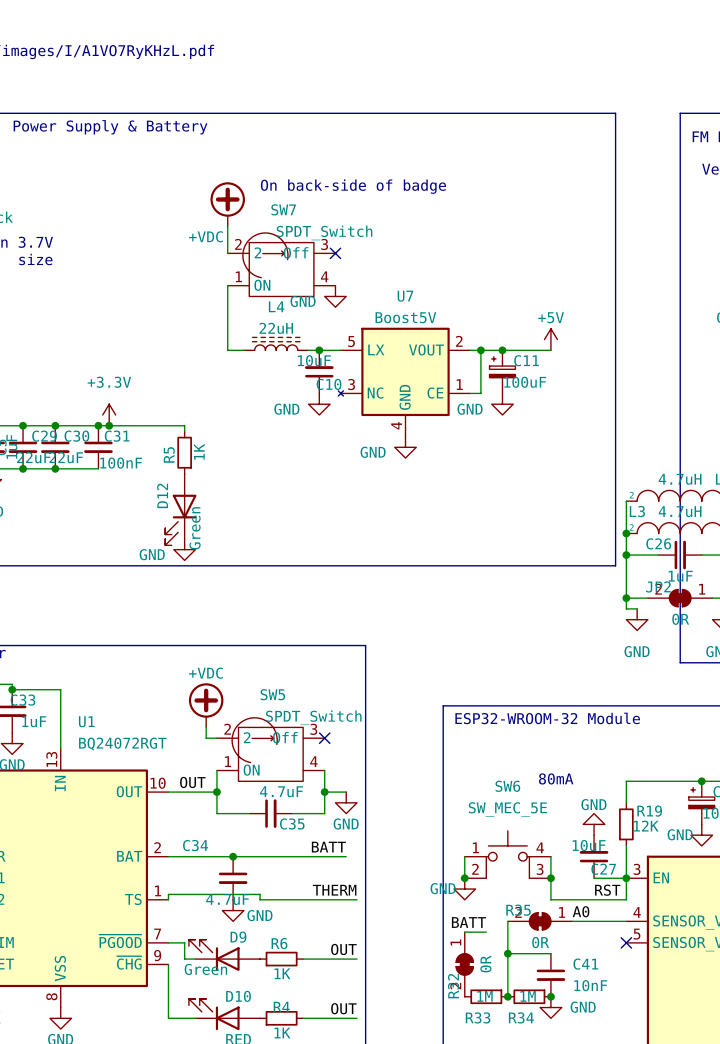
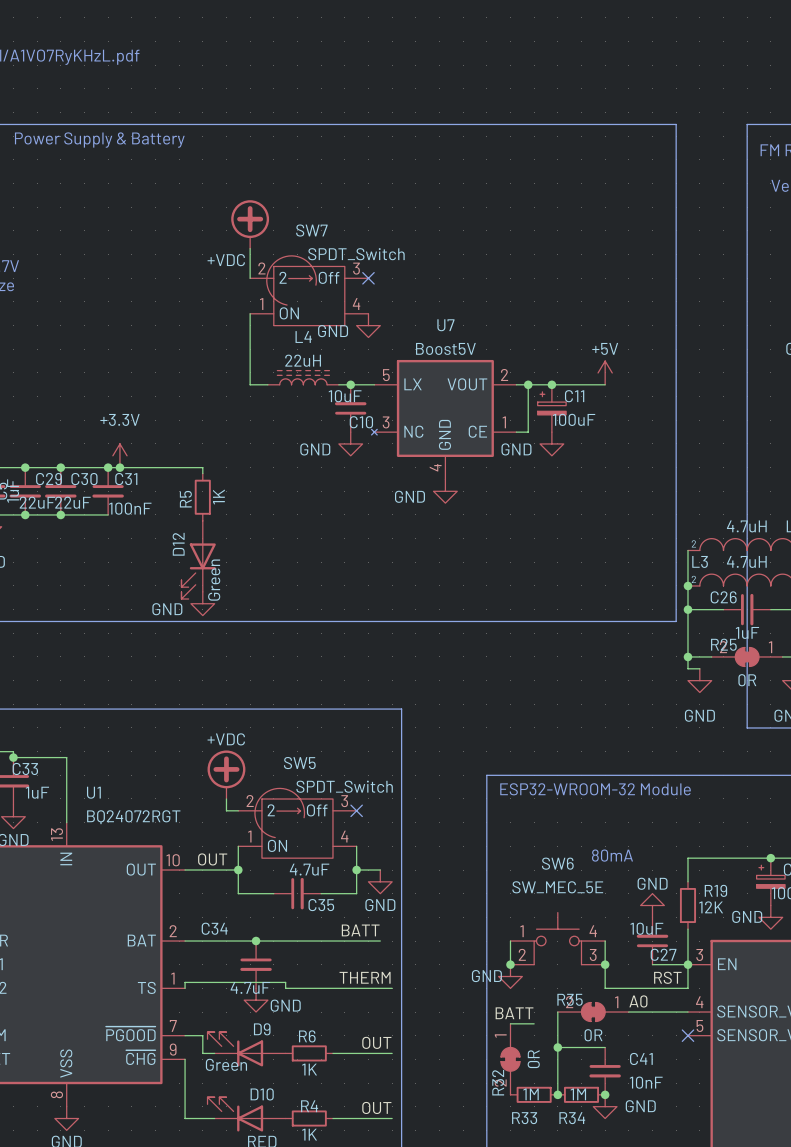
text: On back-side of badge (353, 186) -> none
JP2 name: JP2 (658, 586) -> R25 (723, 644)

